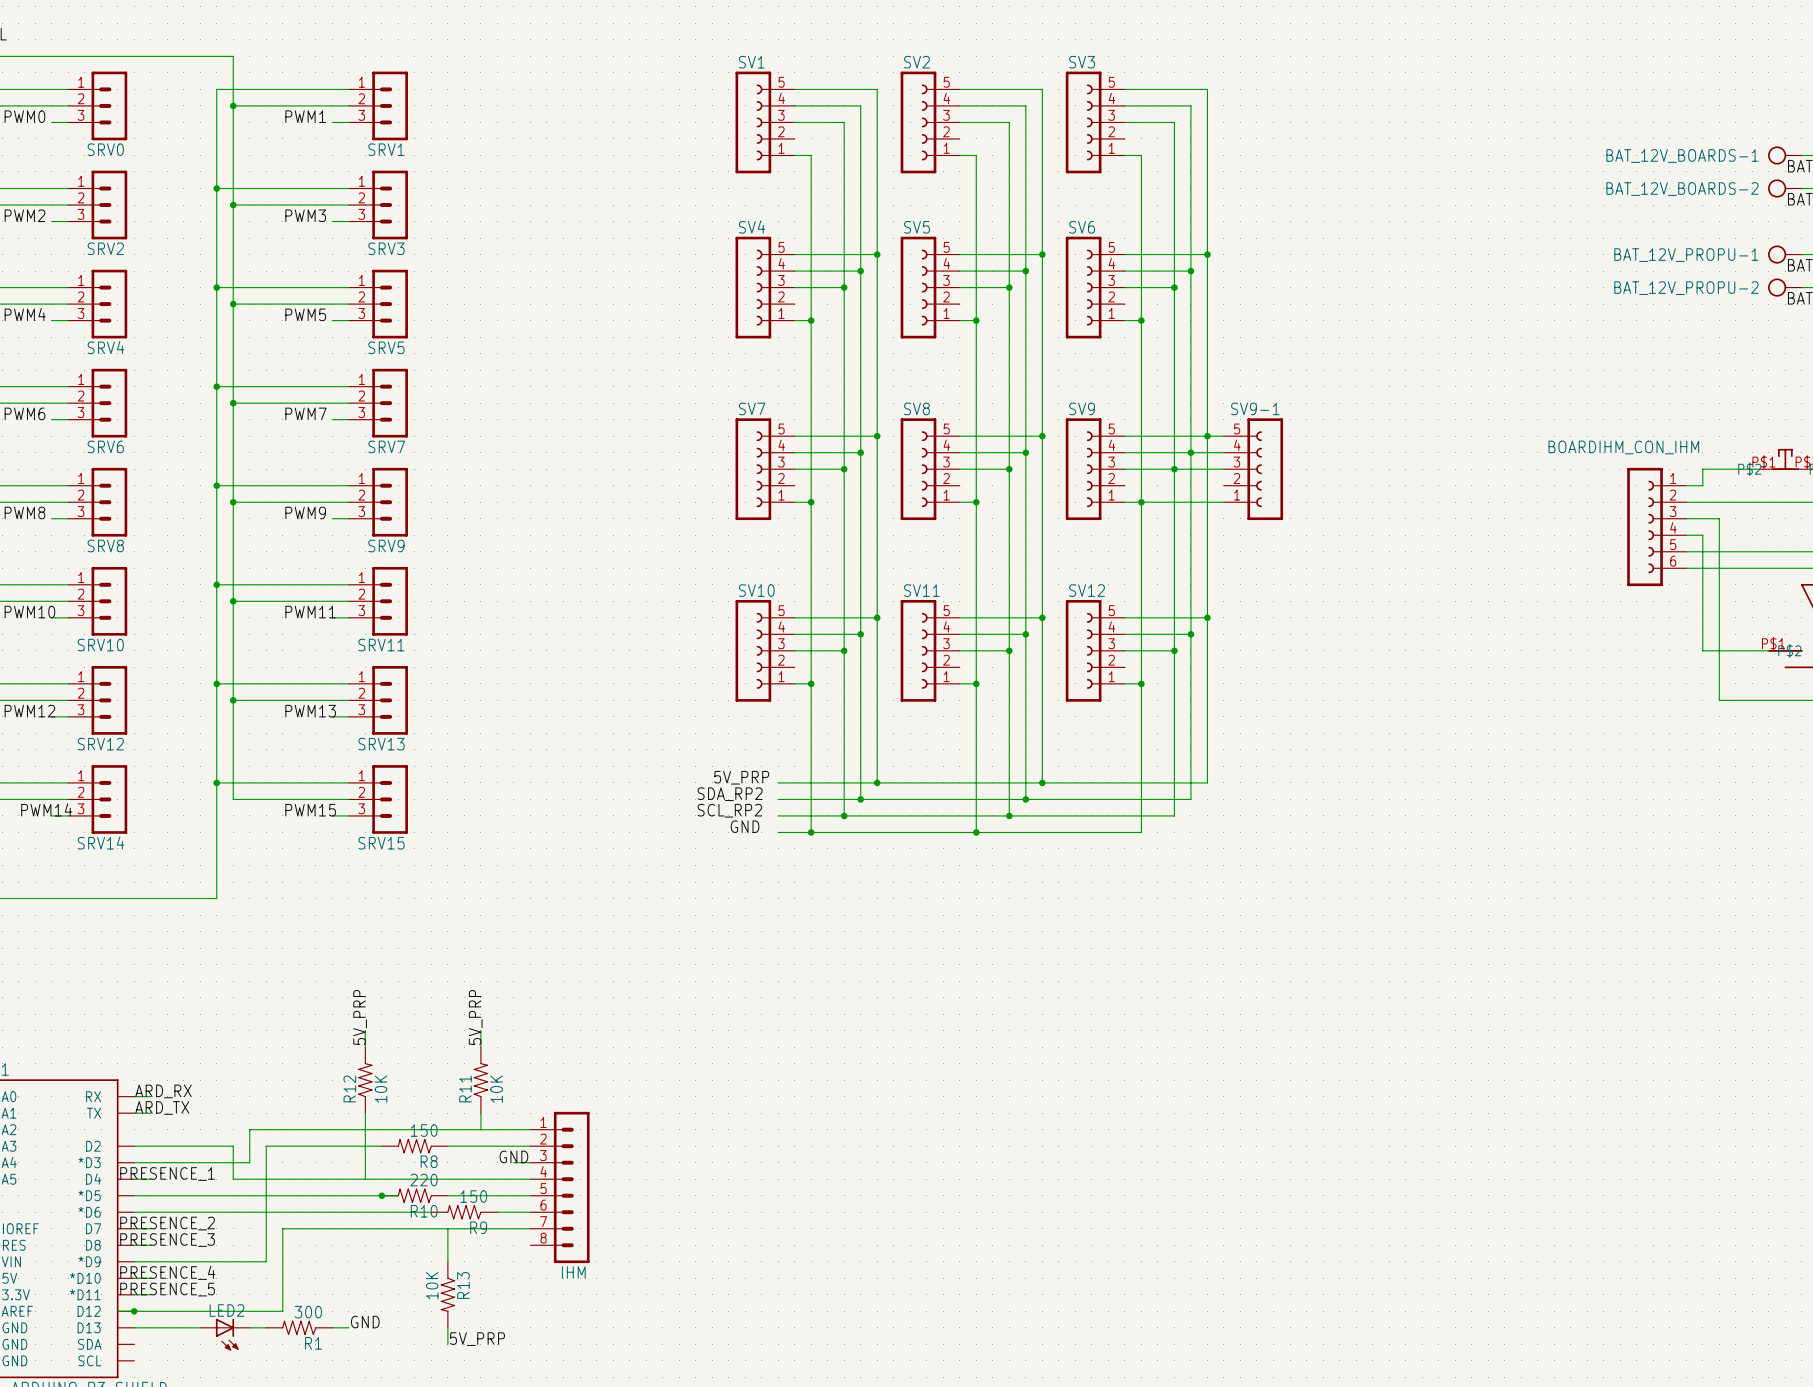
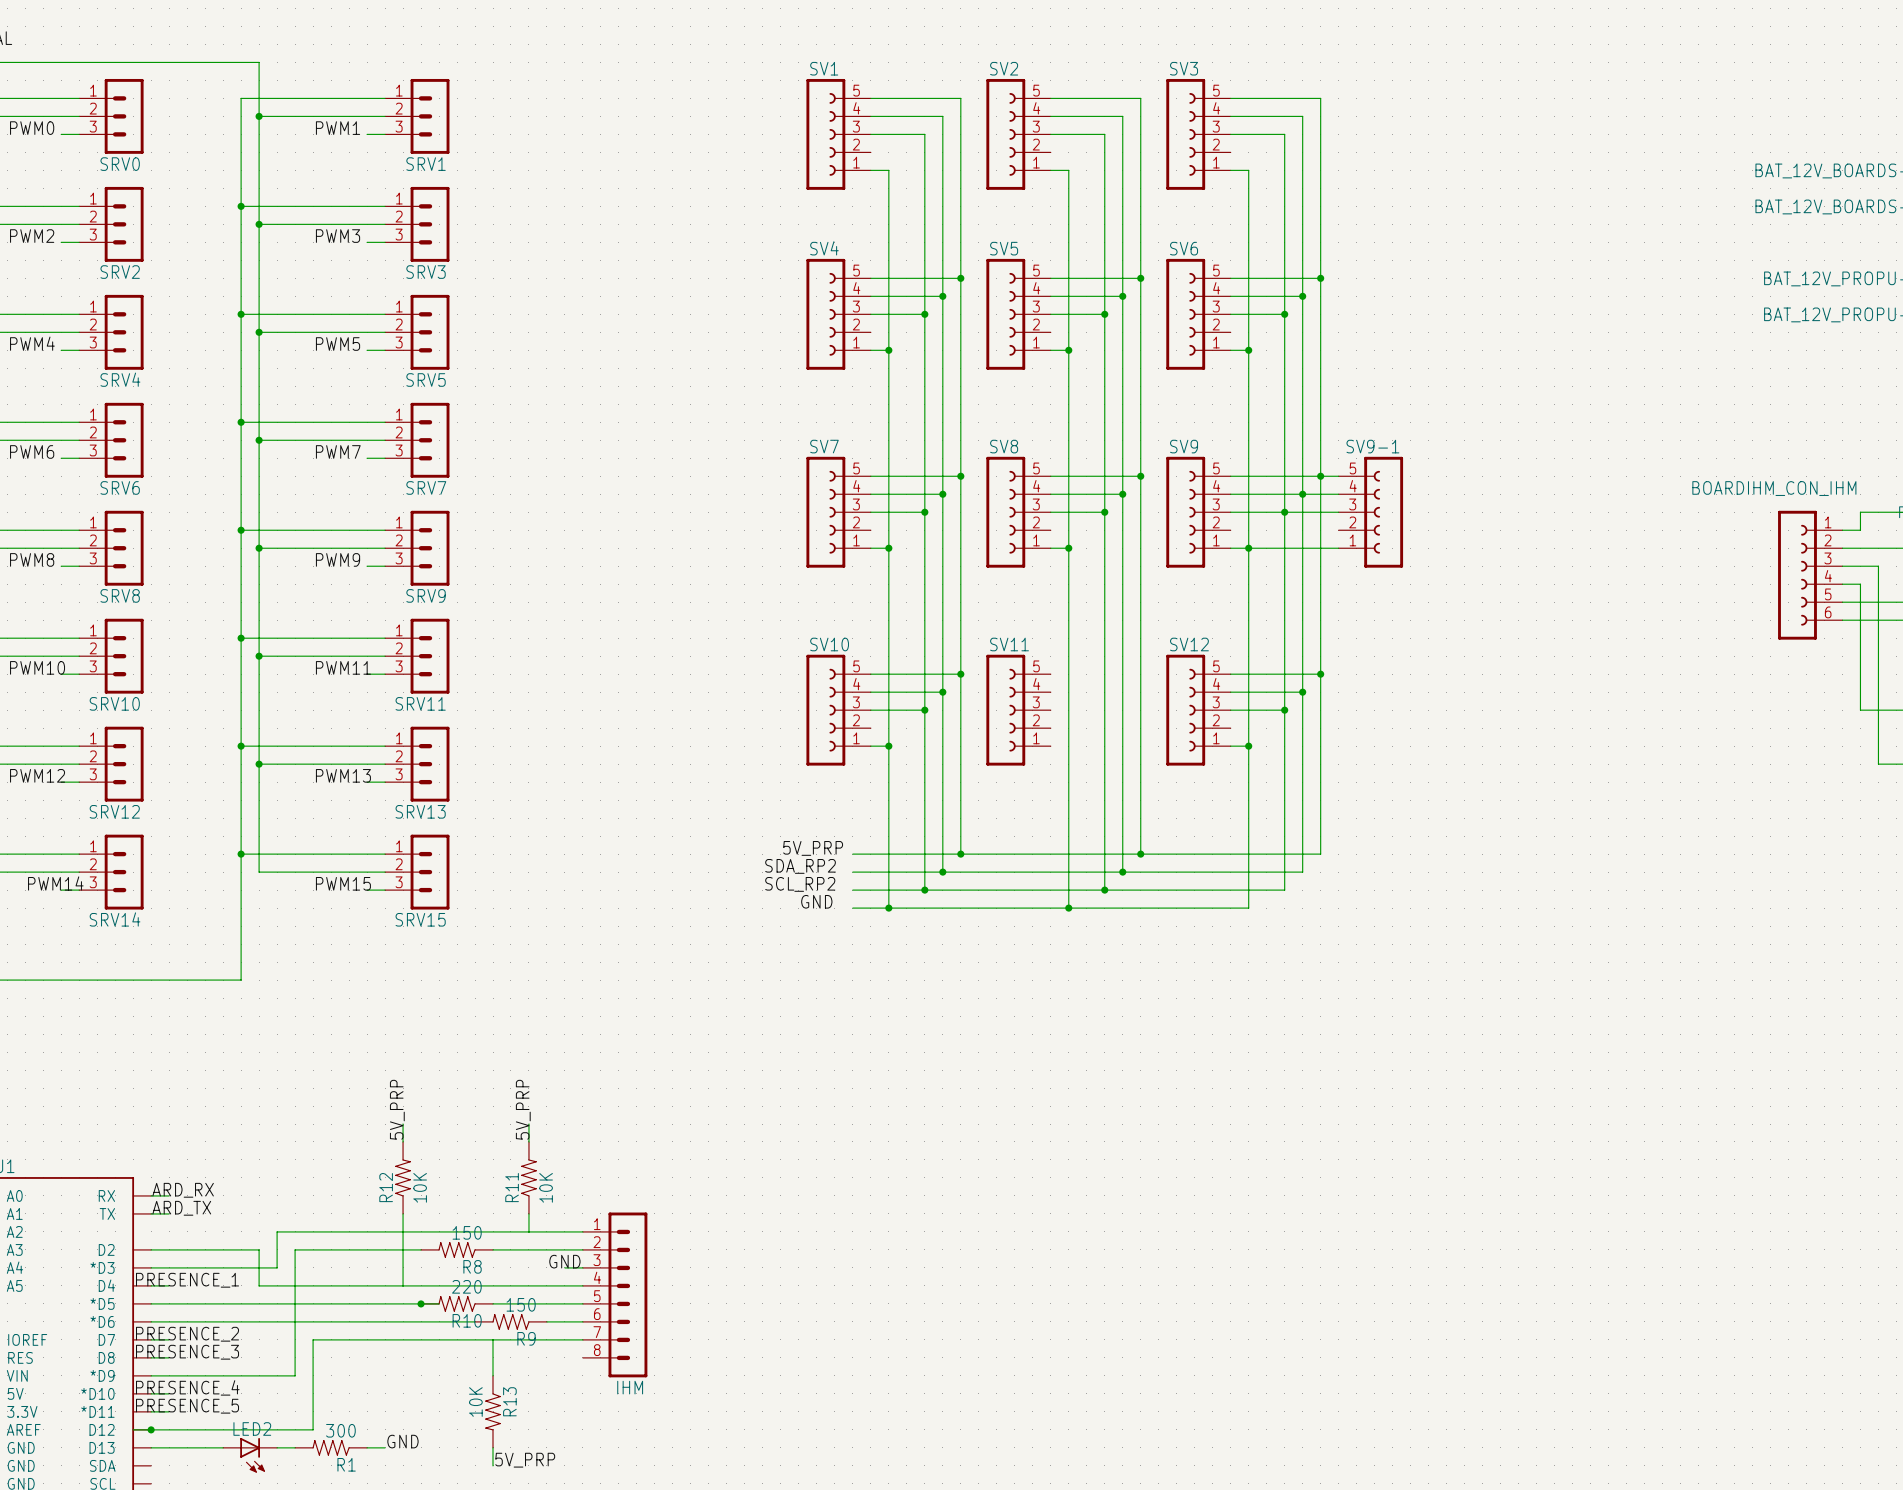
wire: (959, 617) (1042, 617) -> none
junction: (1042, 617) -> none
wire: (959, 634) (1025, 634) -> none
junction: (1025, 634) -> none
wire: (959, 650) (1009, 650) -> none
junction: (1009, 650) -> none
wire: (959, 683) (976, 683) -> none
junction: (976, 683) -> none

